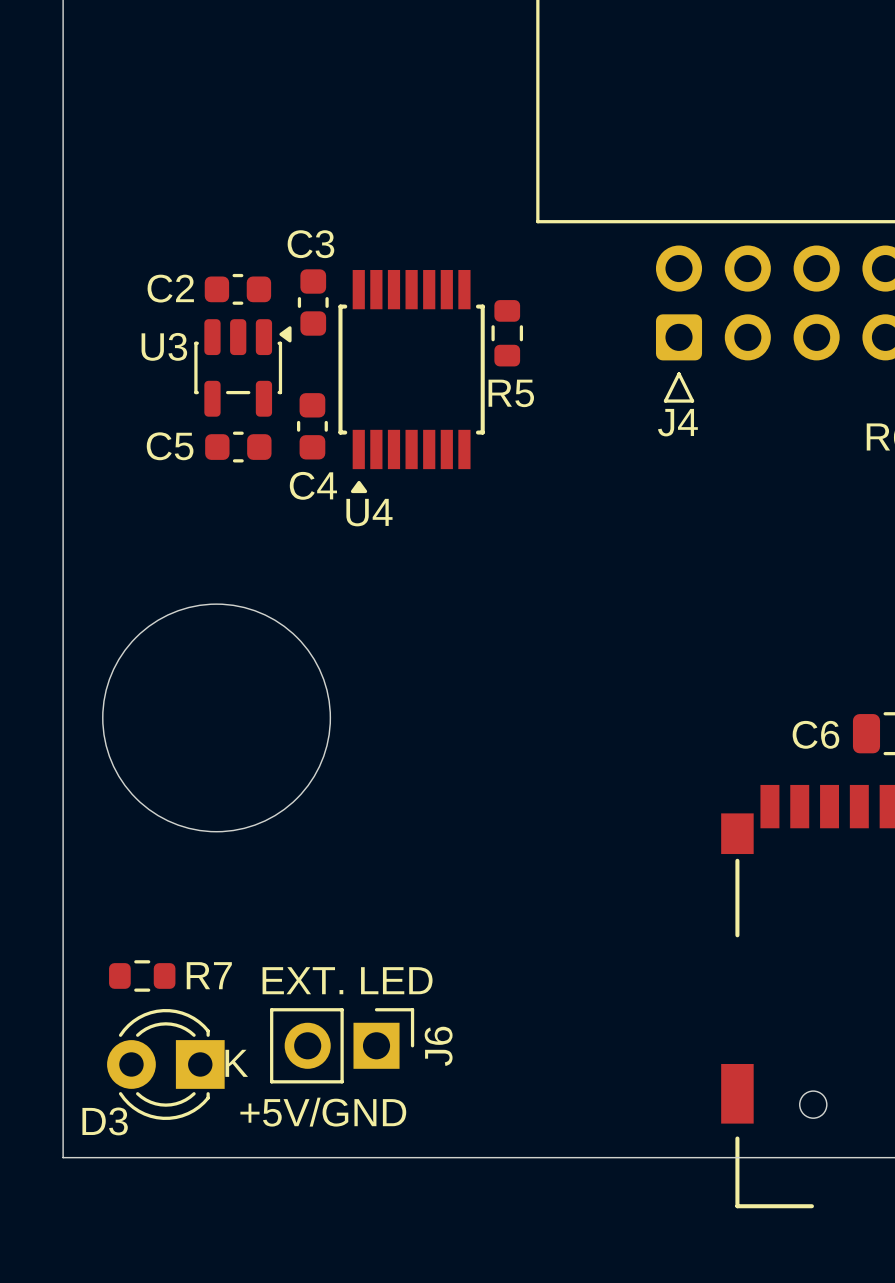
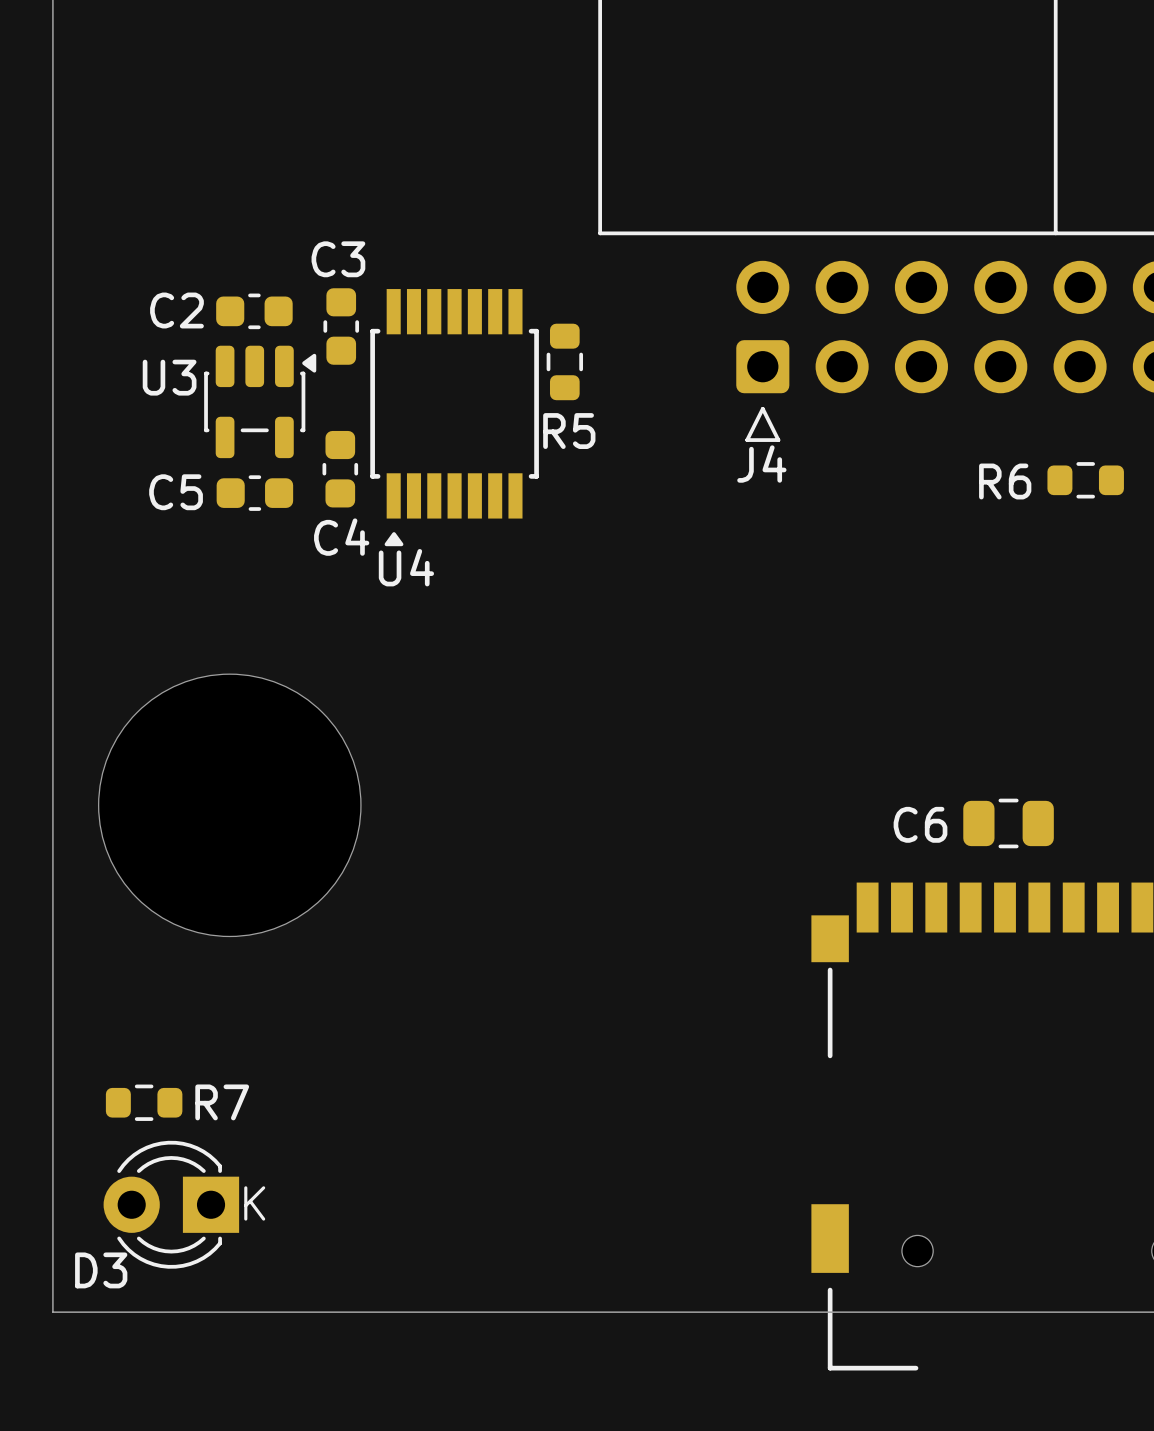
text: EXT. LED (347, 980) -> none
J6: (342, 1045) -> none
text: +5V/GND (323, 1112) -> none

